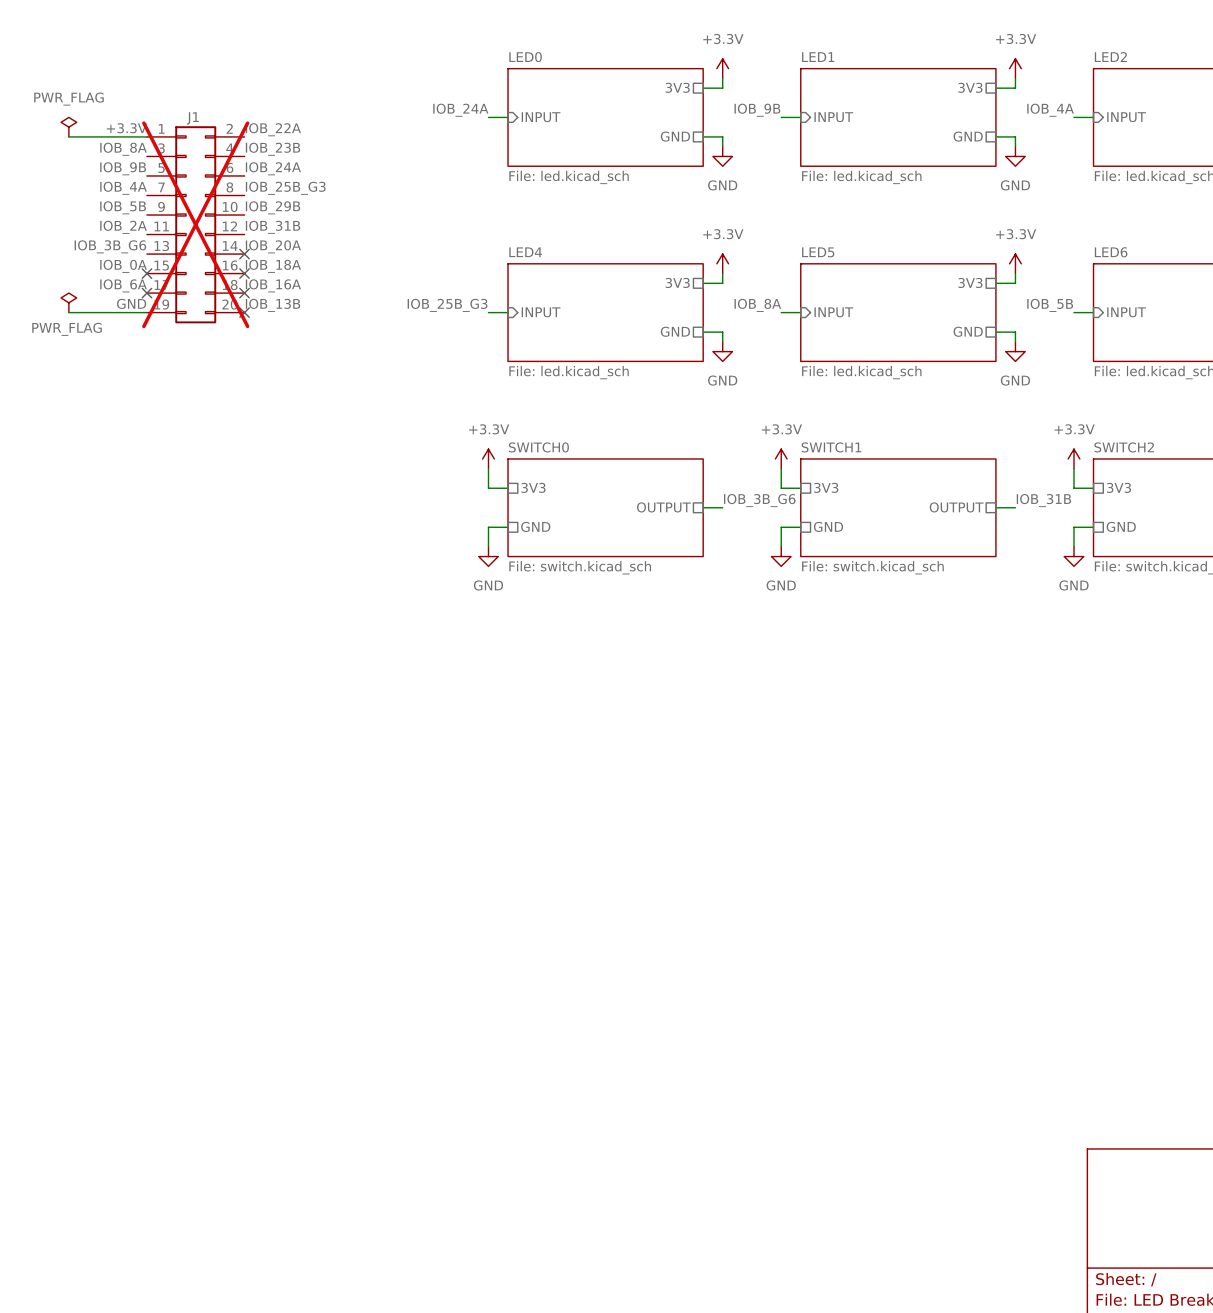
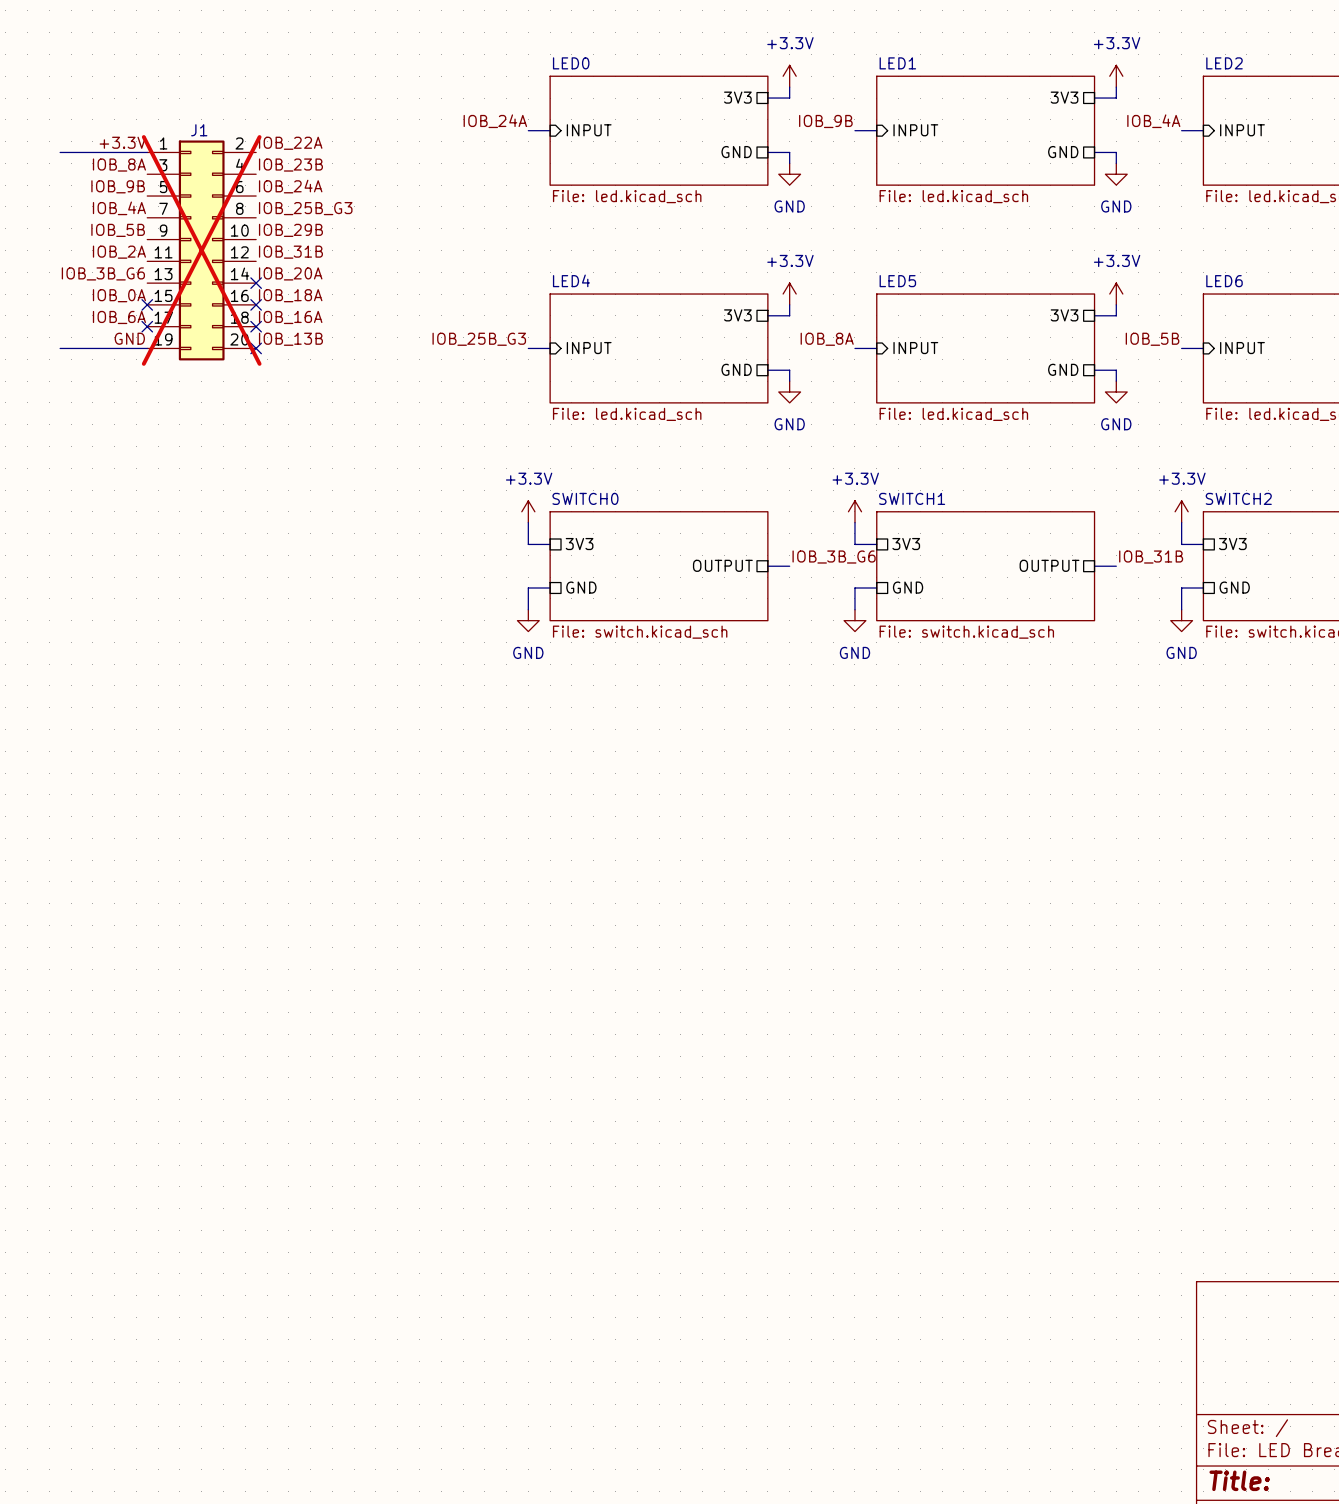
power symbol: PWR_FLAG (68, 127) -> none
power symbol: PWR_FLAG (68, 302) -> none

